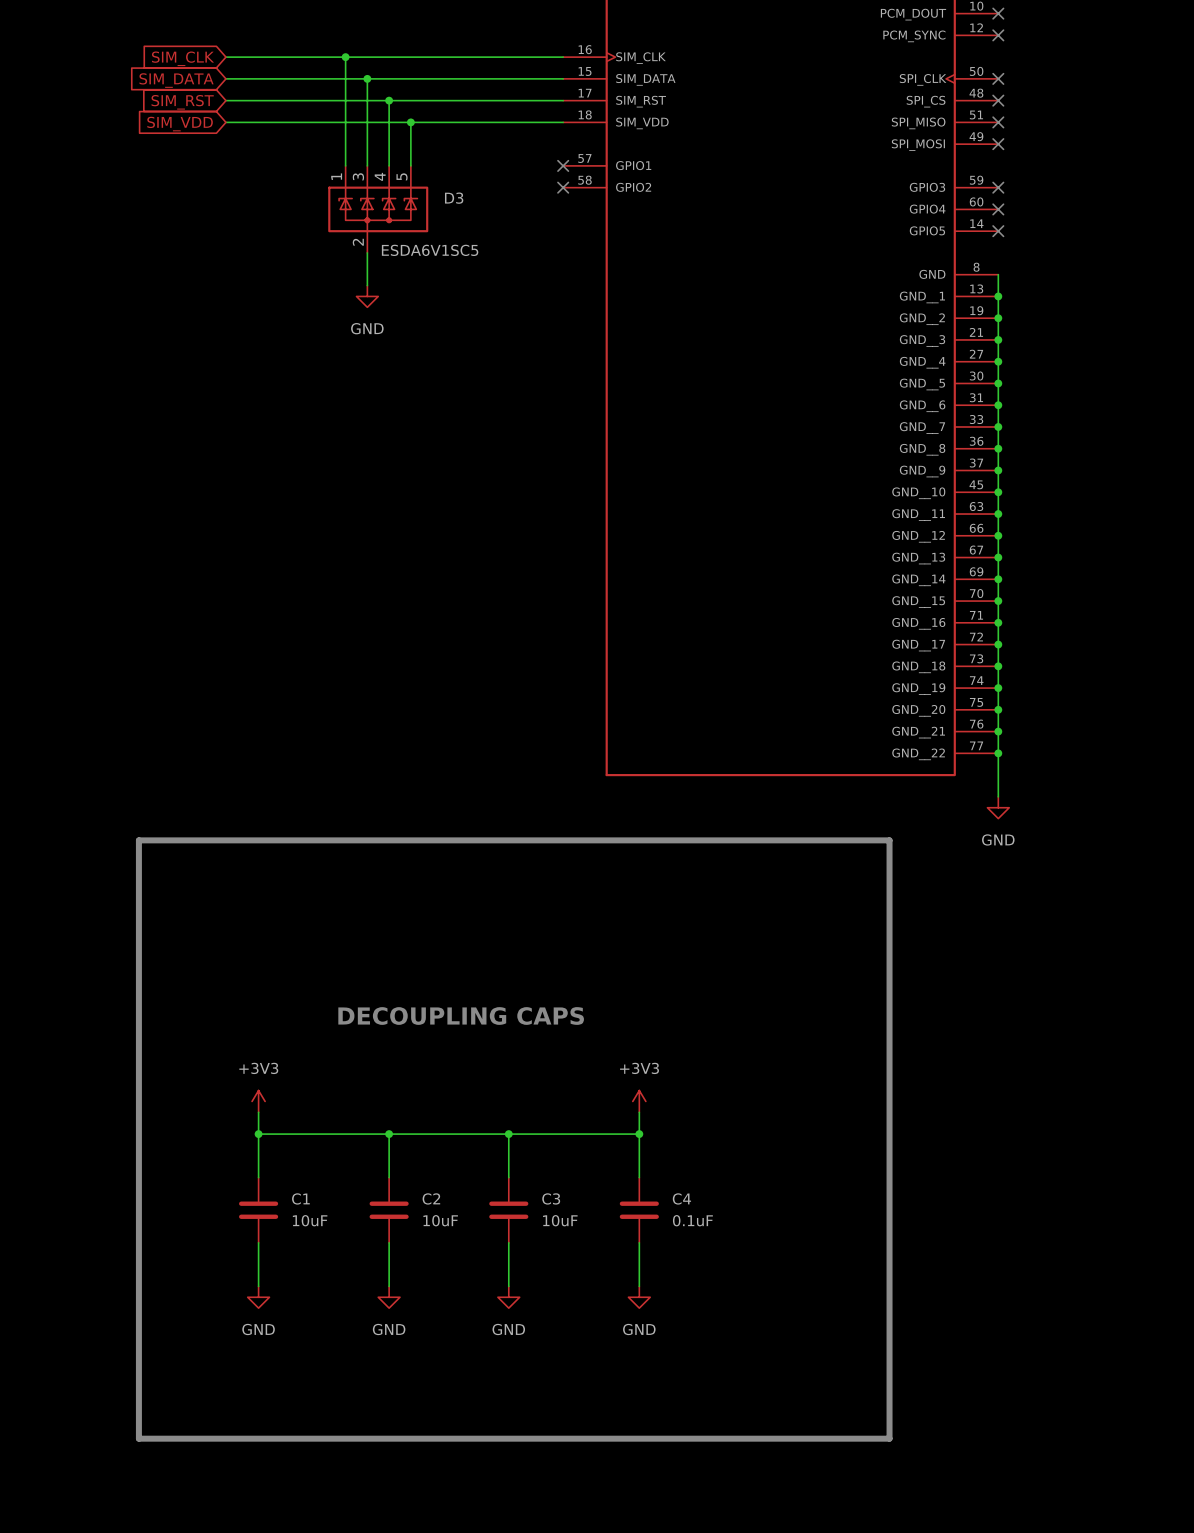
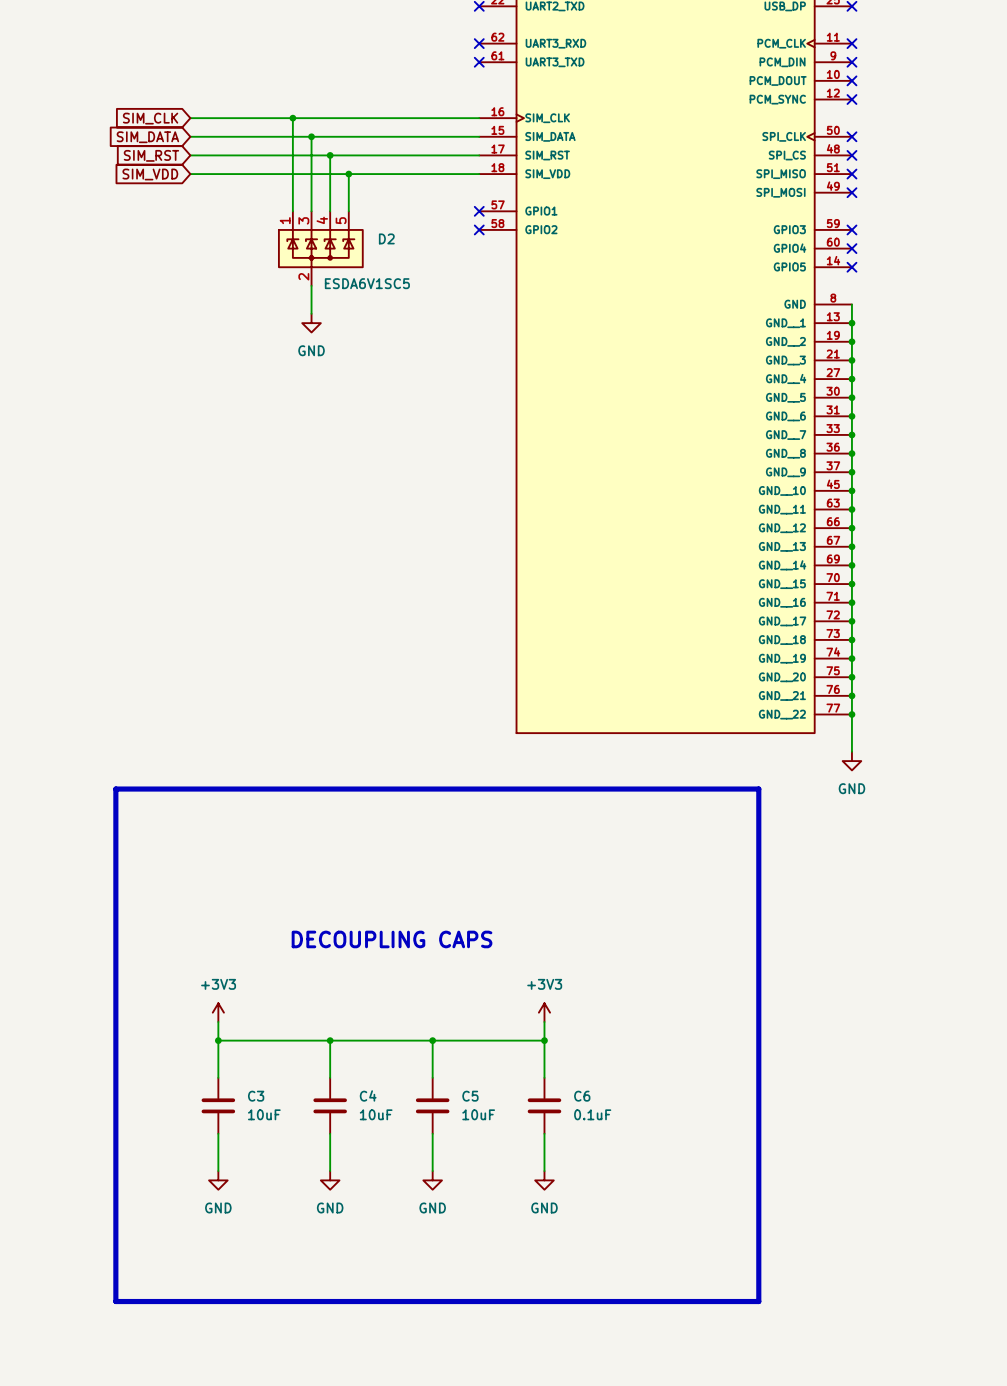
D3 name: D3 (454, 198) -> D2 (386, 238)
C1 name: C1 (300, 1198) -> C3 (256, 1096)
C2 name: C2 (431, 1198) -> C4 (368, 1095)
C3 name: C3 (551, 1198) -> C5 (470, 1096)
C4 name: C4 (681, 1198) -> C6 (582, 1096)

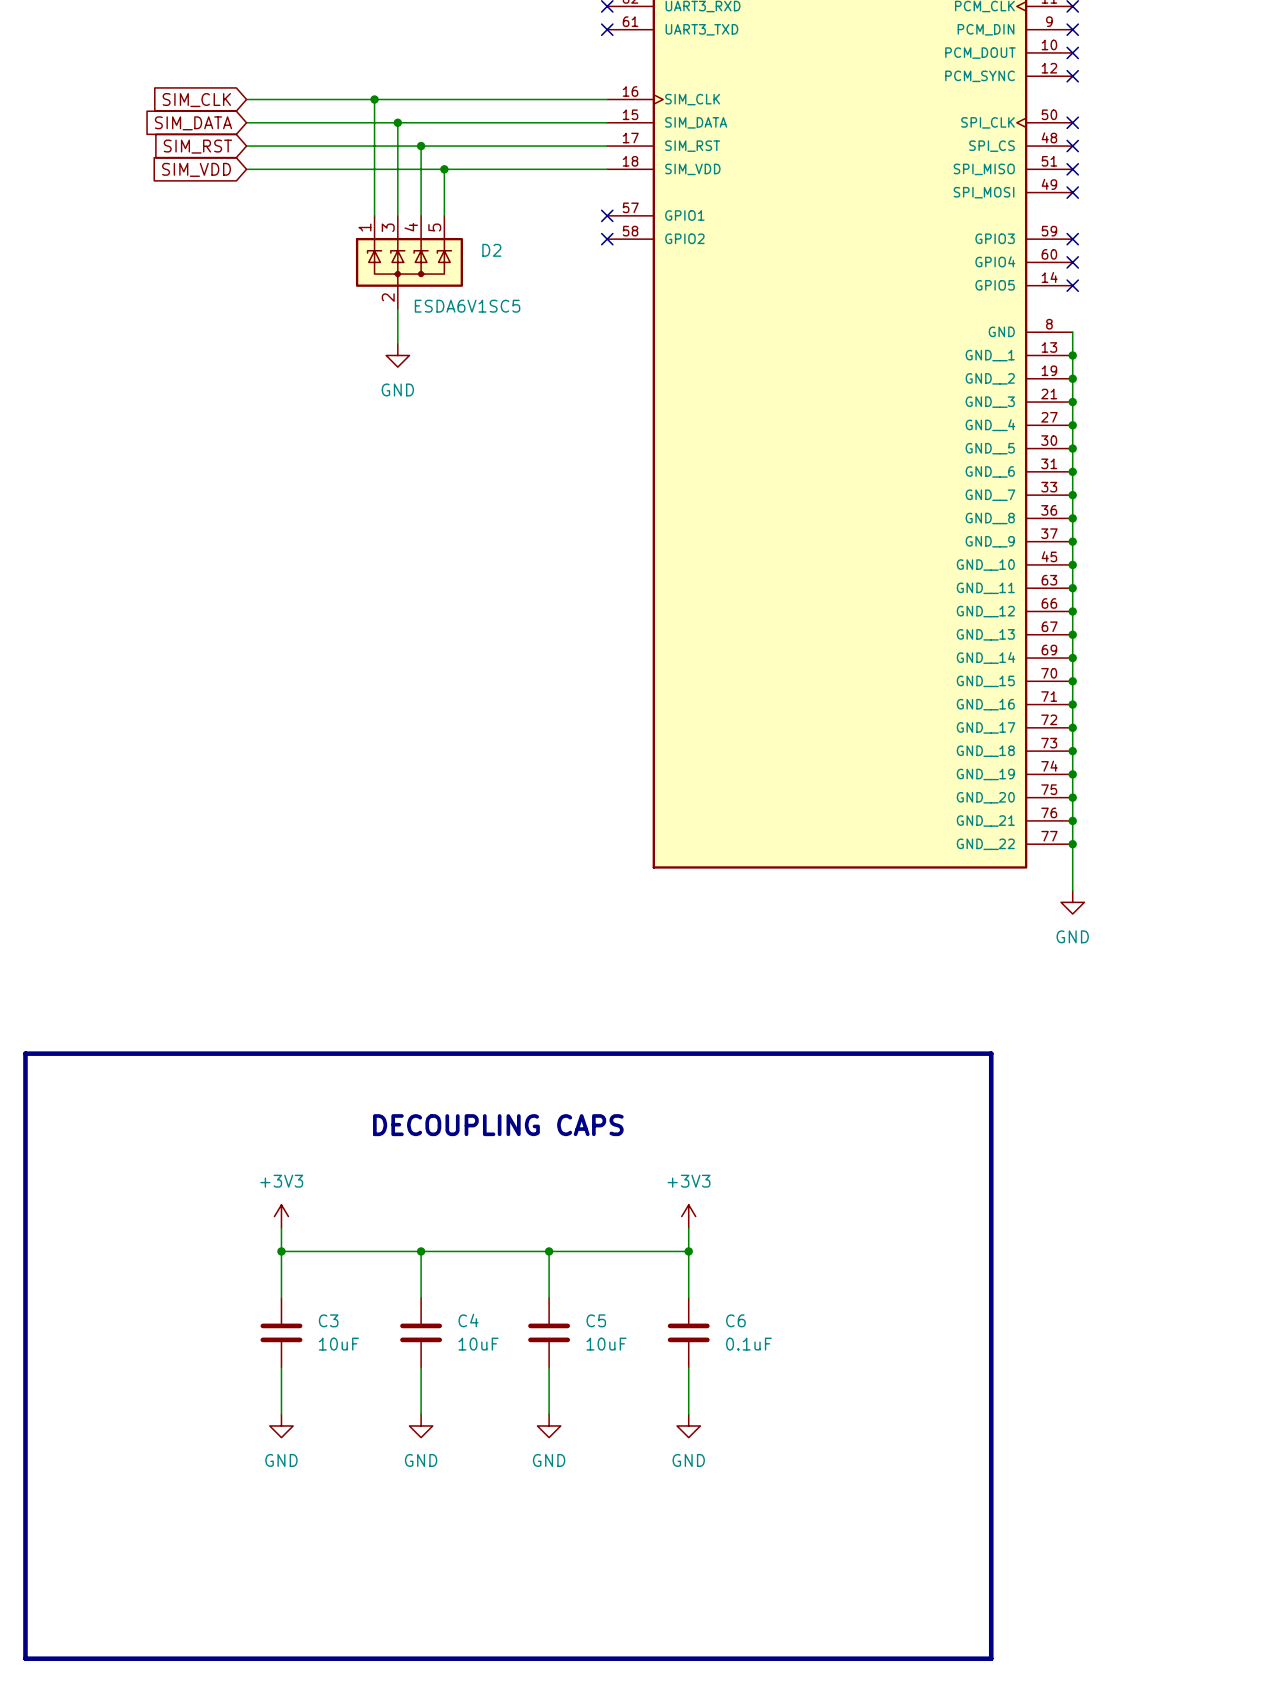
line: (115, 789) (758, 789) (758, 1301) (115, 1301) (115, 789) -> (25, 1053) (25, 1658) (991, 1658) (991, 1053) (25, 1053)

